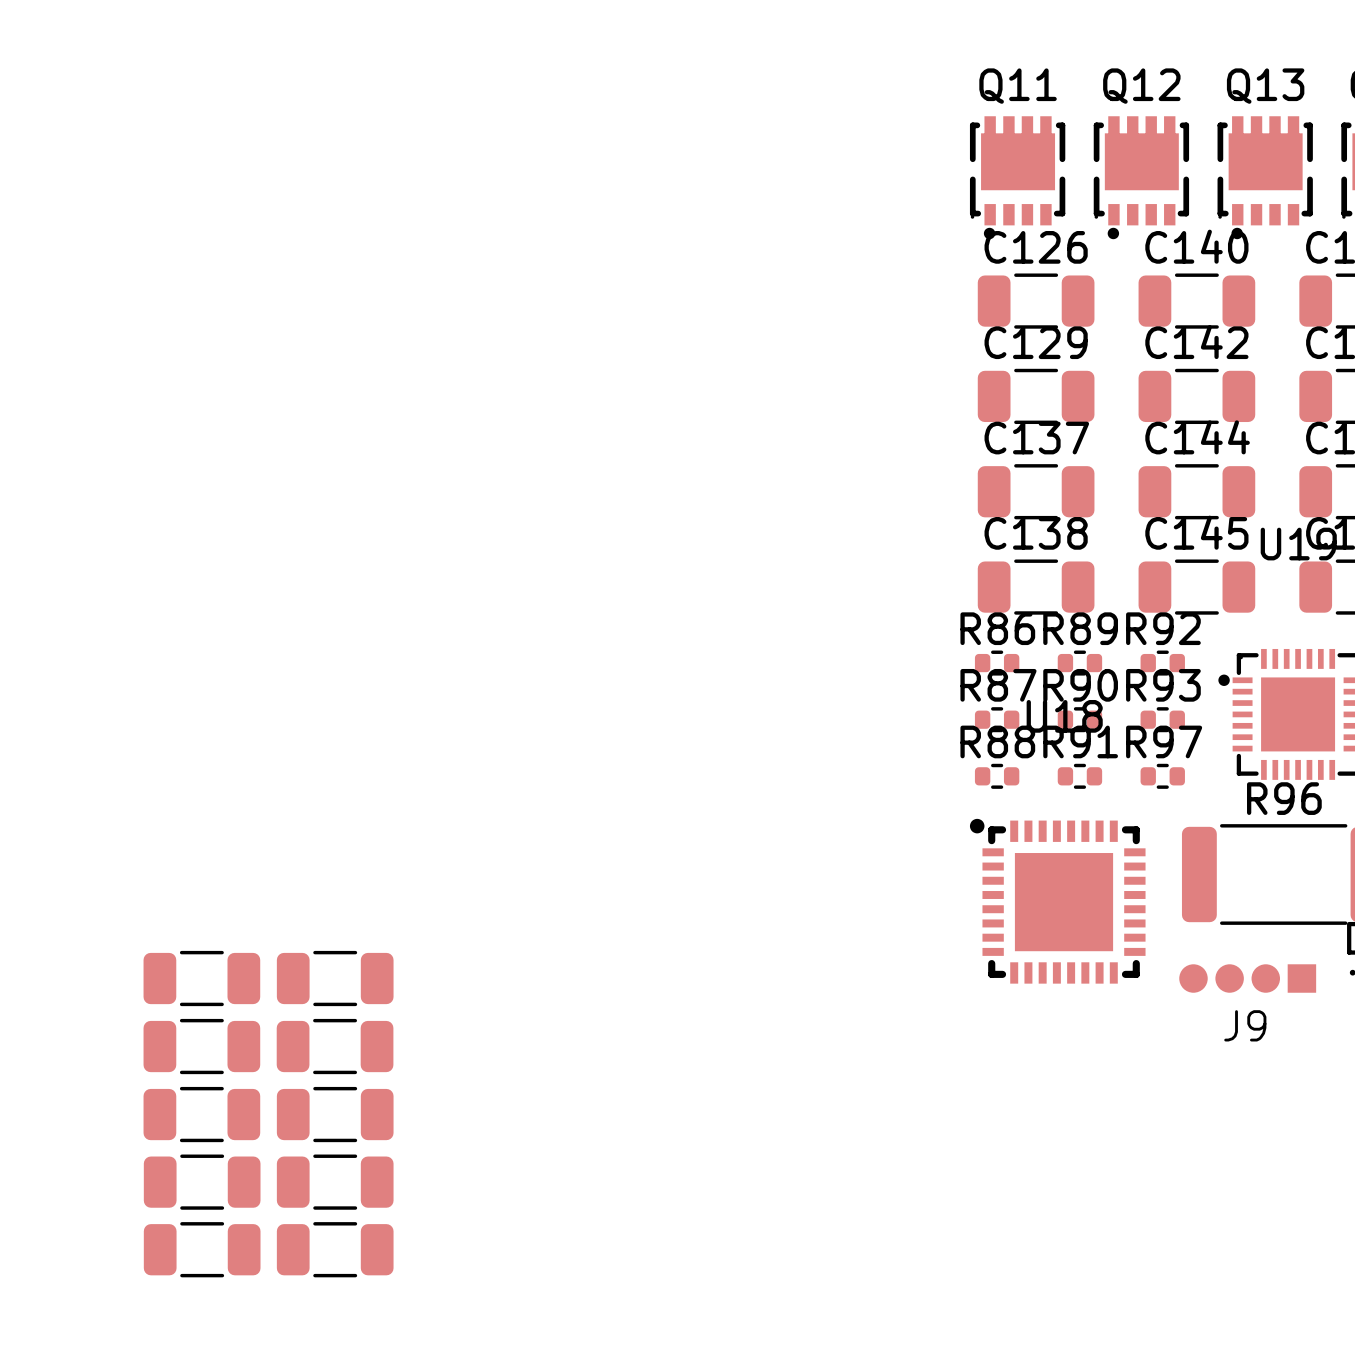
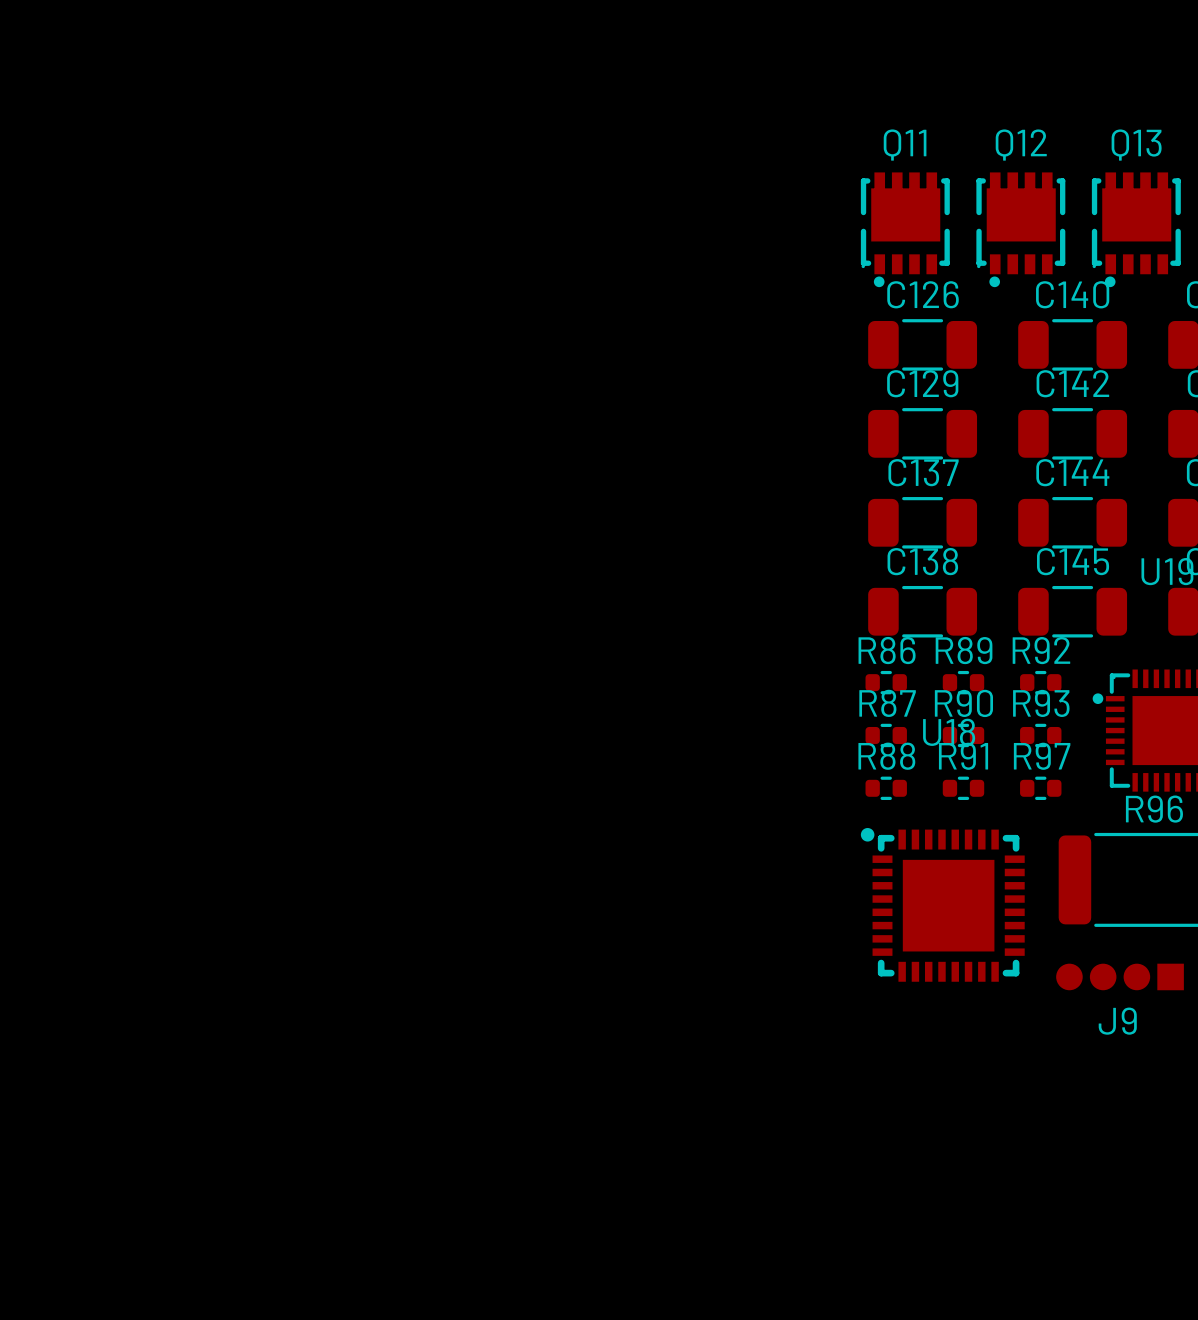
part: (201, 978) -> none
part: (335, 978) -> none
part: (201, 1046) -> none
part: (335, 1046) -> none
part: (201, 1114) -> none
part: (335, 1114) -> none
part: (202, 1182) -> none
part: (335, 1182) -> none
part: (202, 1249) -> none
part: (335, 1249) -> none

